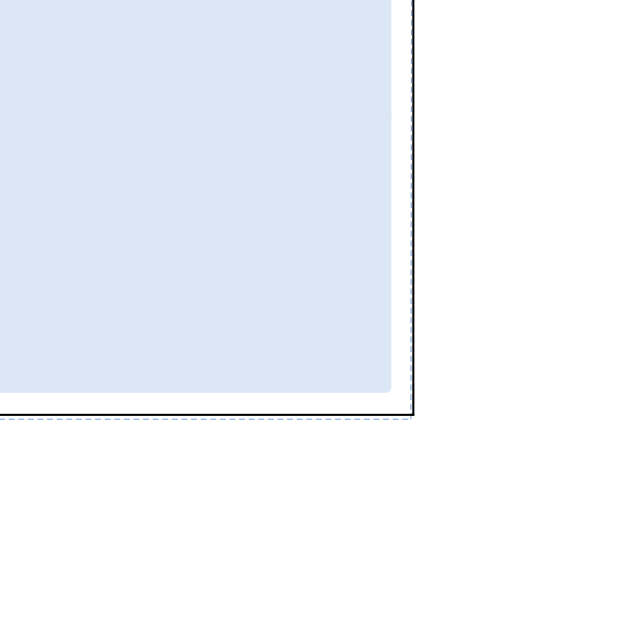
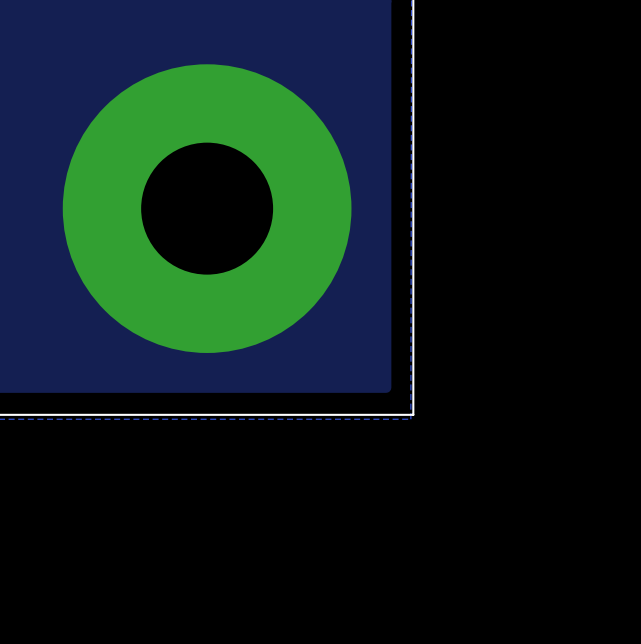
via: none -> (207, 208)

